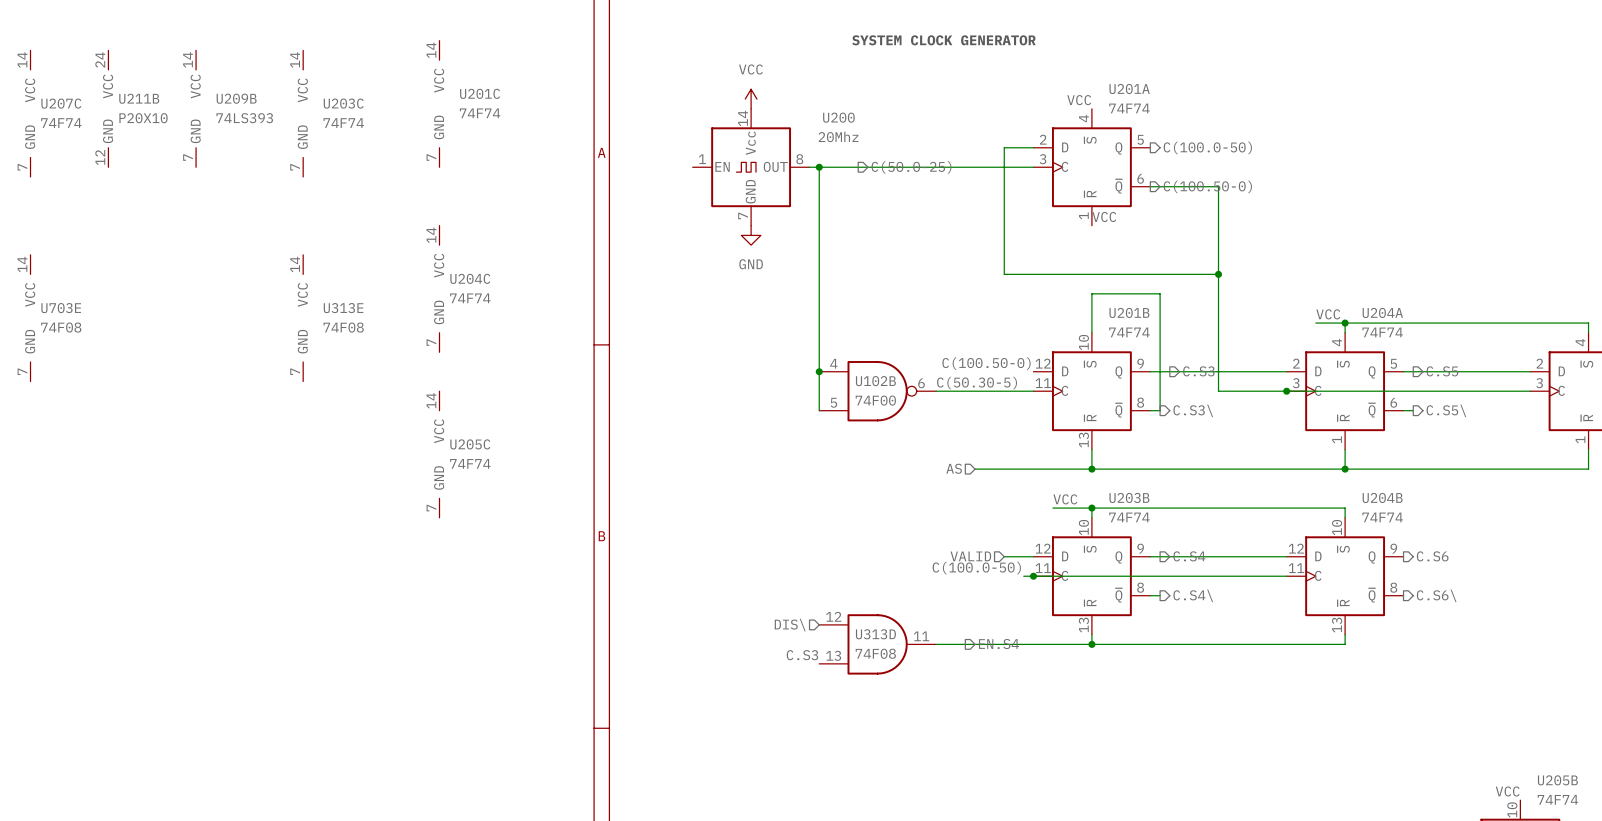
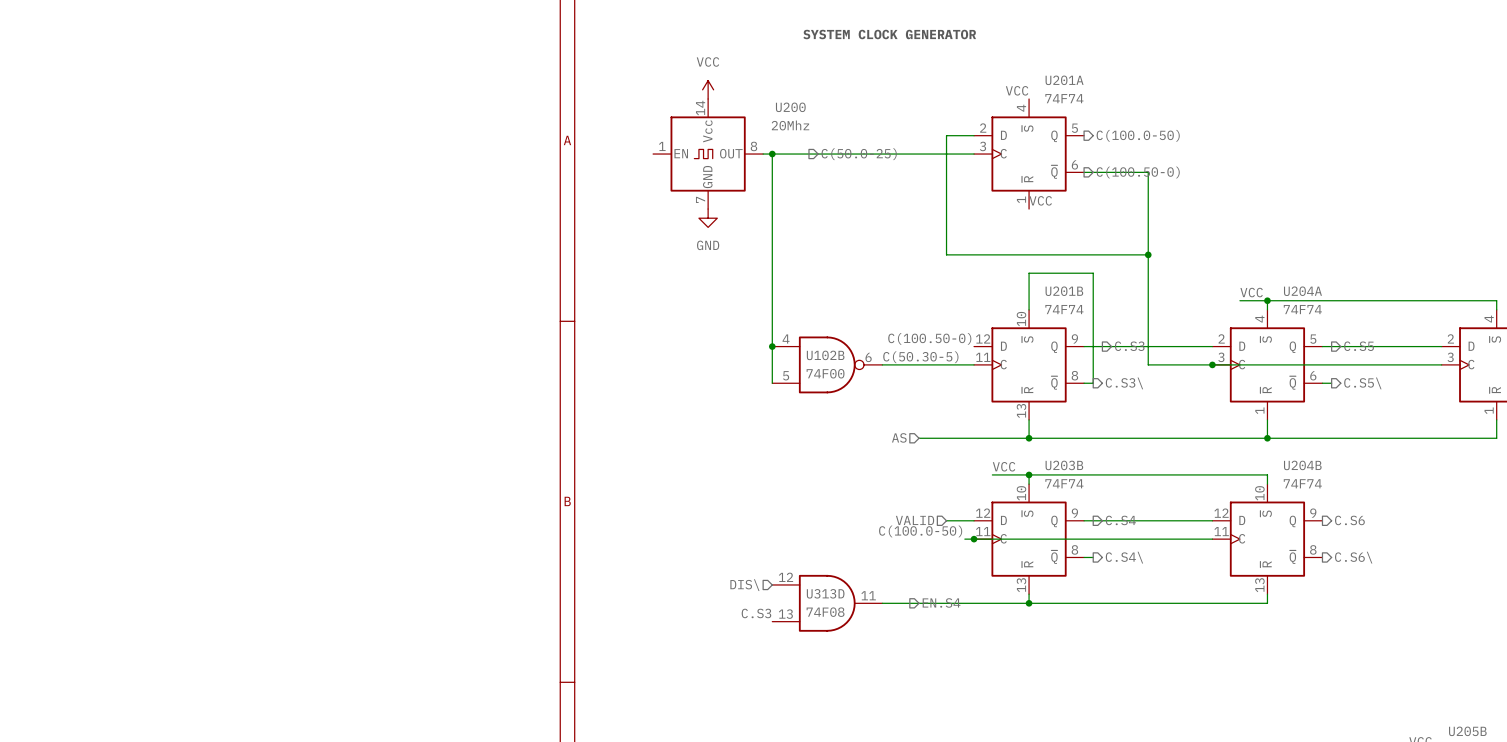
U201C: 74F74 (439, 103) -> none
U211B: P20X10 (108, 108) -> none
U209B: 74LS393 (196, 108) -> none
U207C: 74F74 (30, 113) -> none
U203C: 74F74 (303, 113) -> none
U204C: 74F74 (439, 288) -> none
U703E: 74F08 (30, 318) -> none
U313E: 74F08 (303, 318) -> none
U205C: 74F74 (439, 454) -> none

